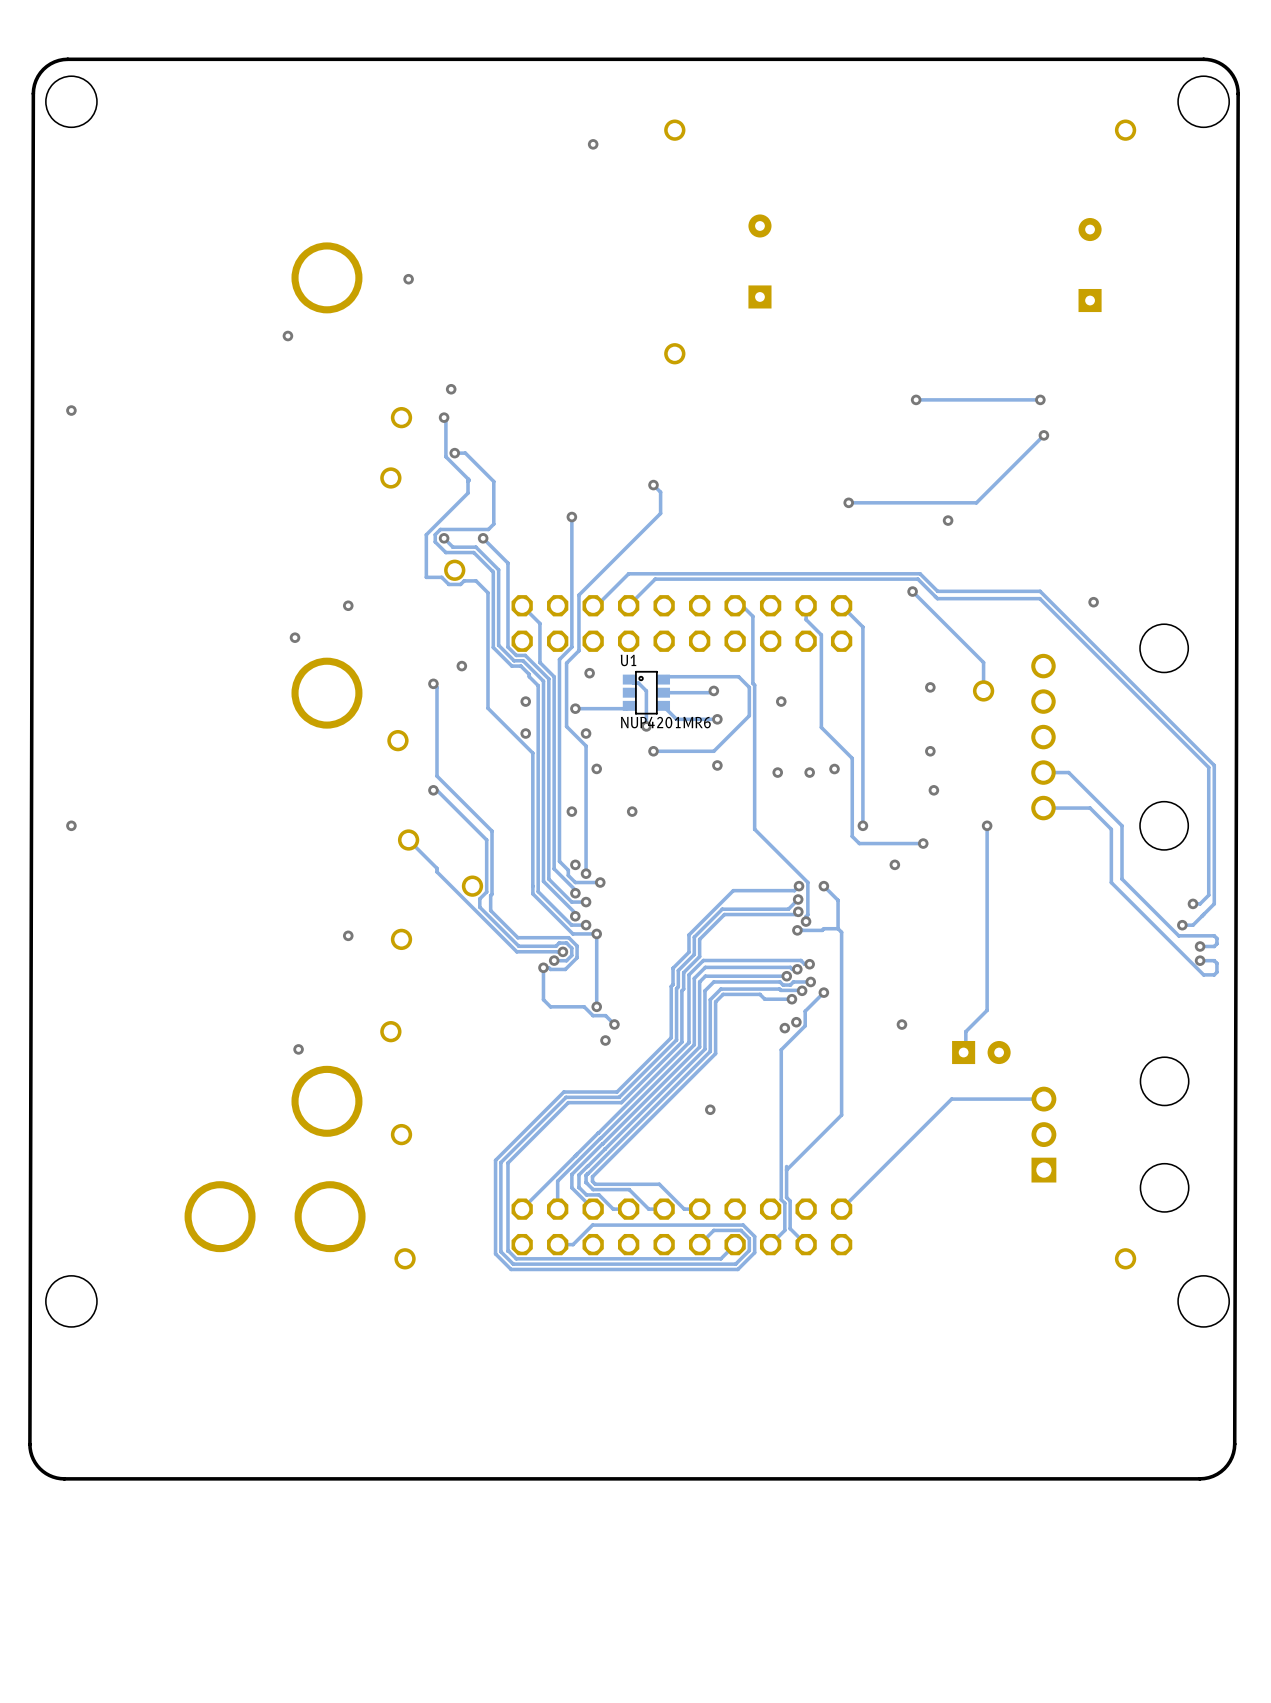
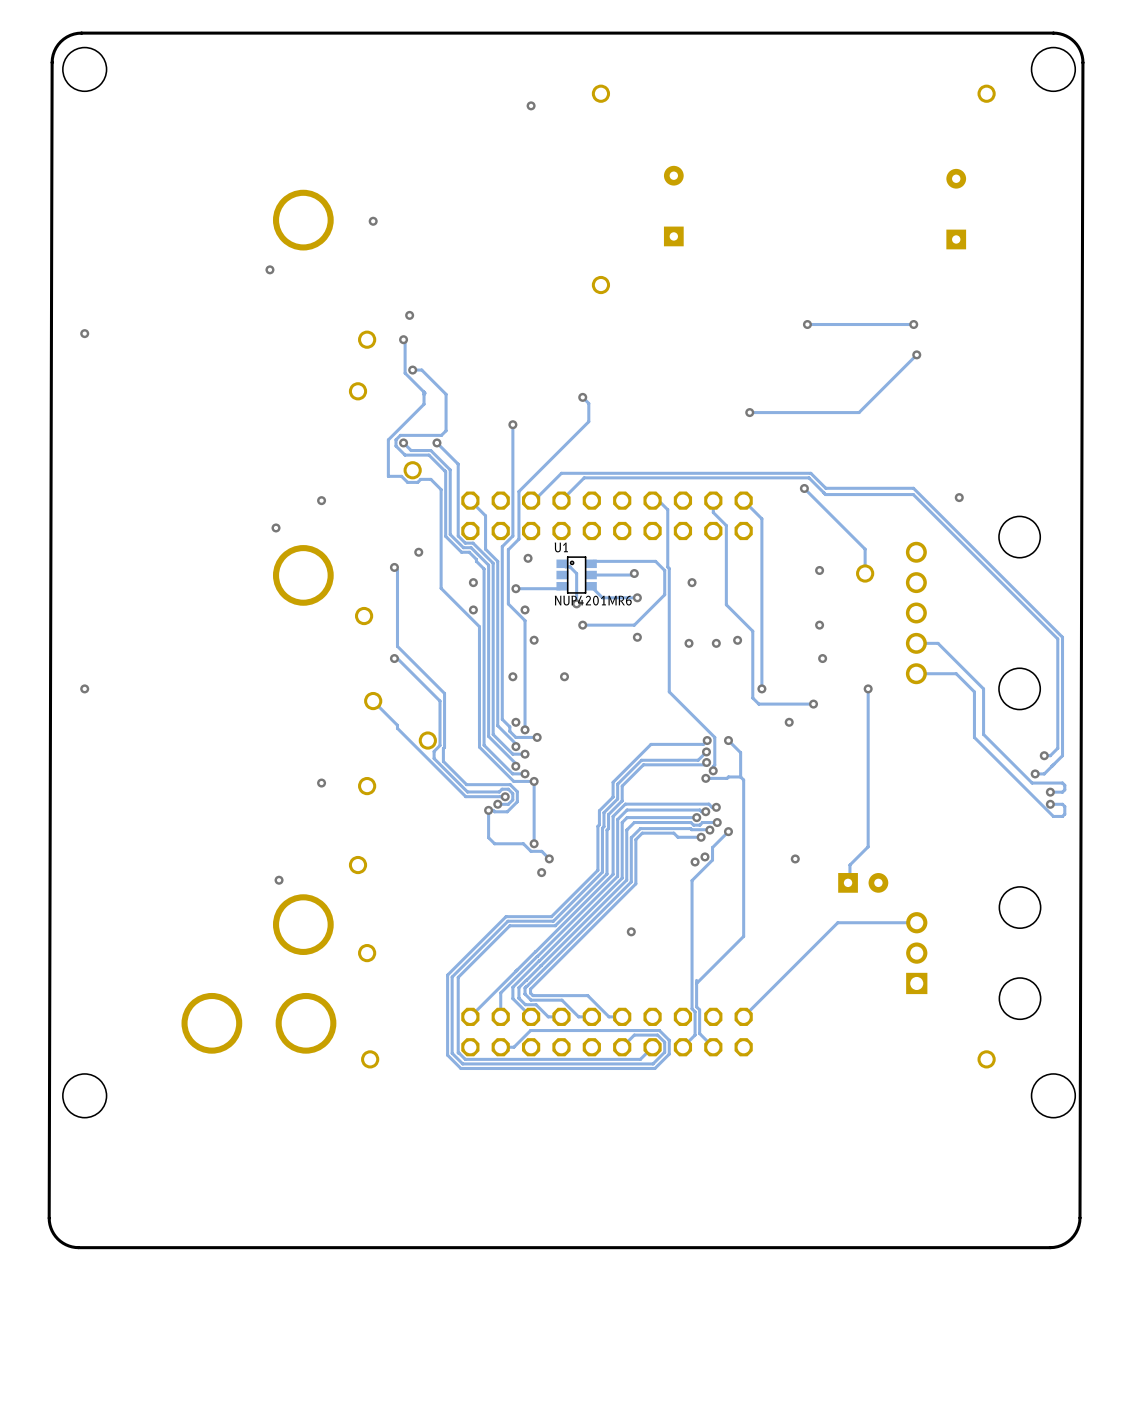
via: (948, 520) -> none

